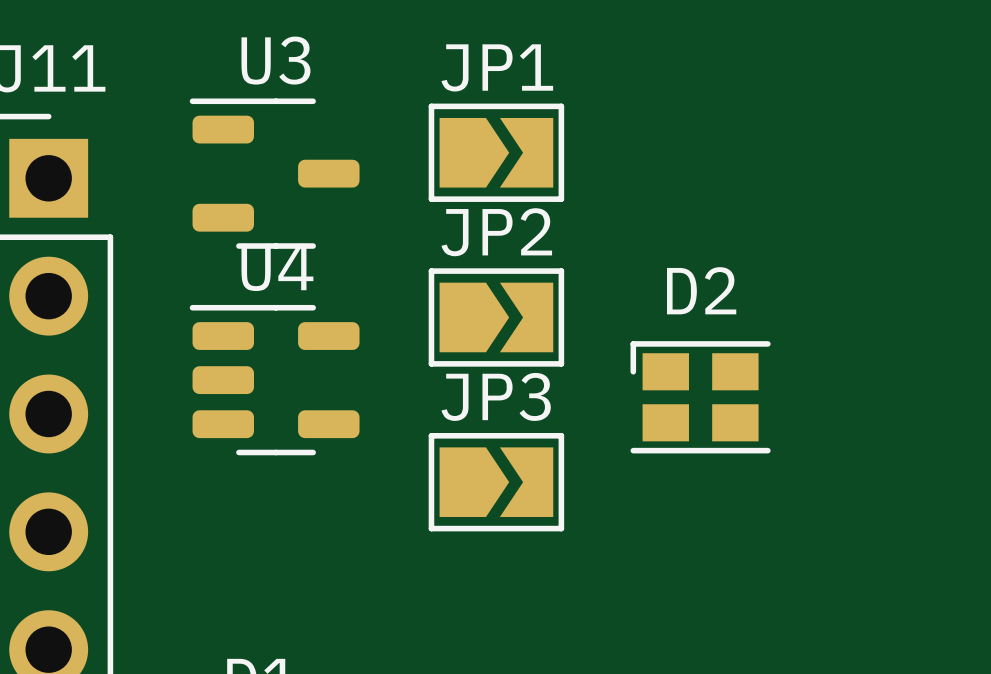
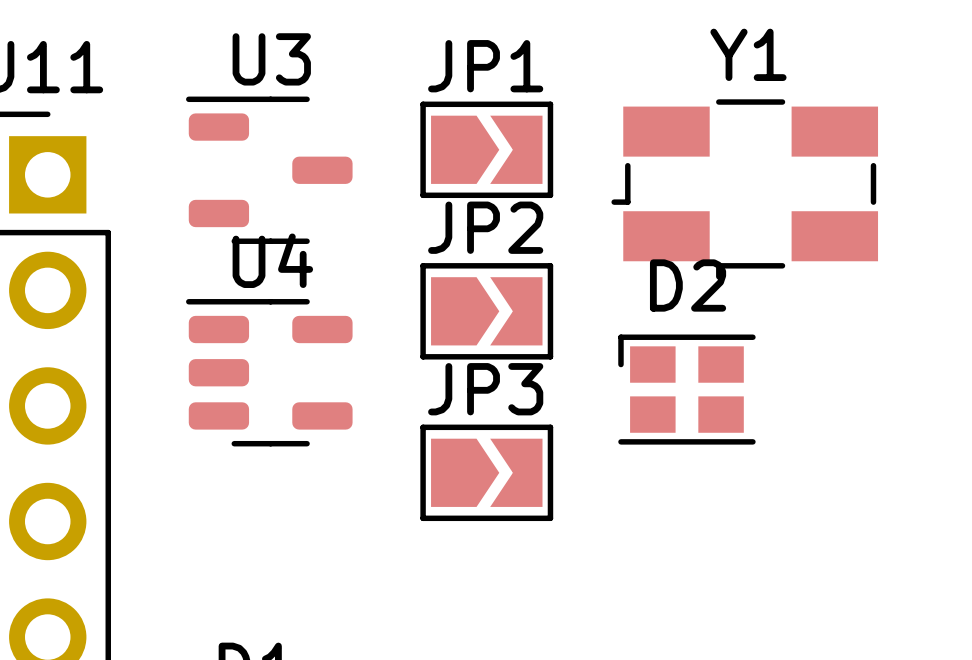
Y1: none -> (744, 189)

